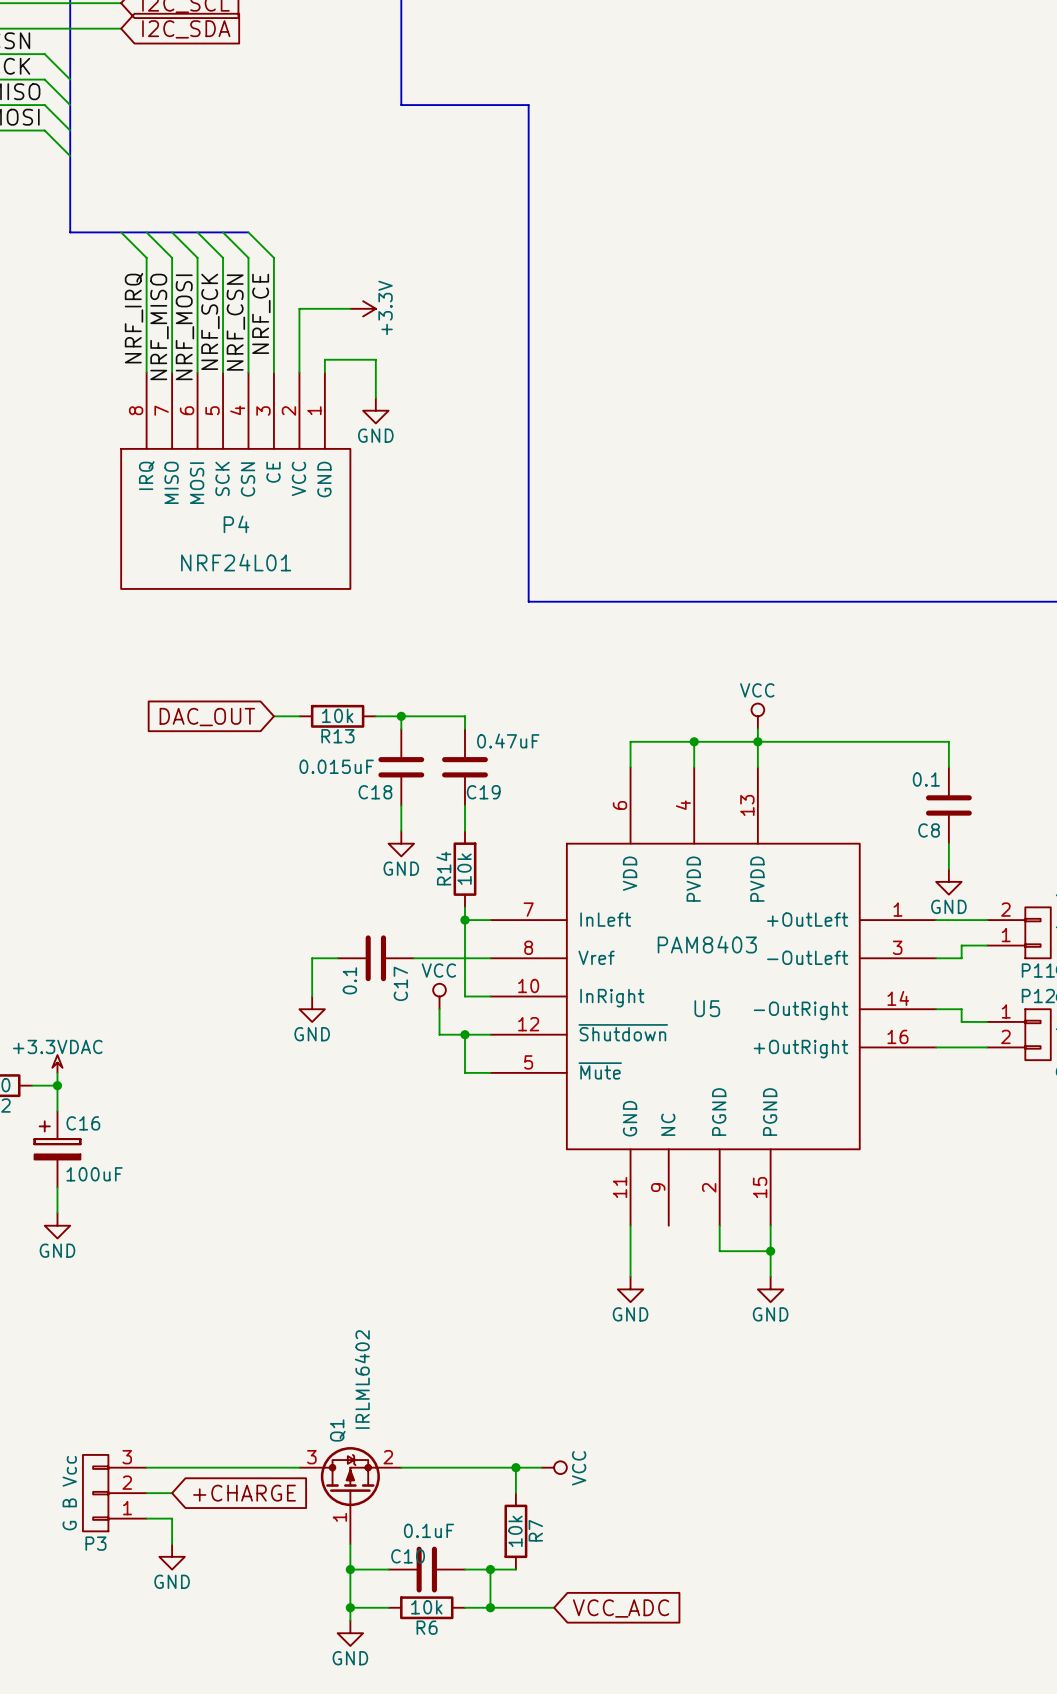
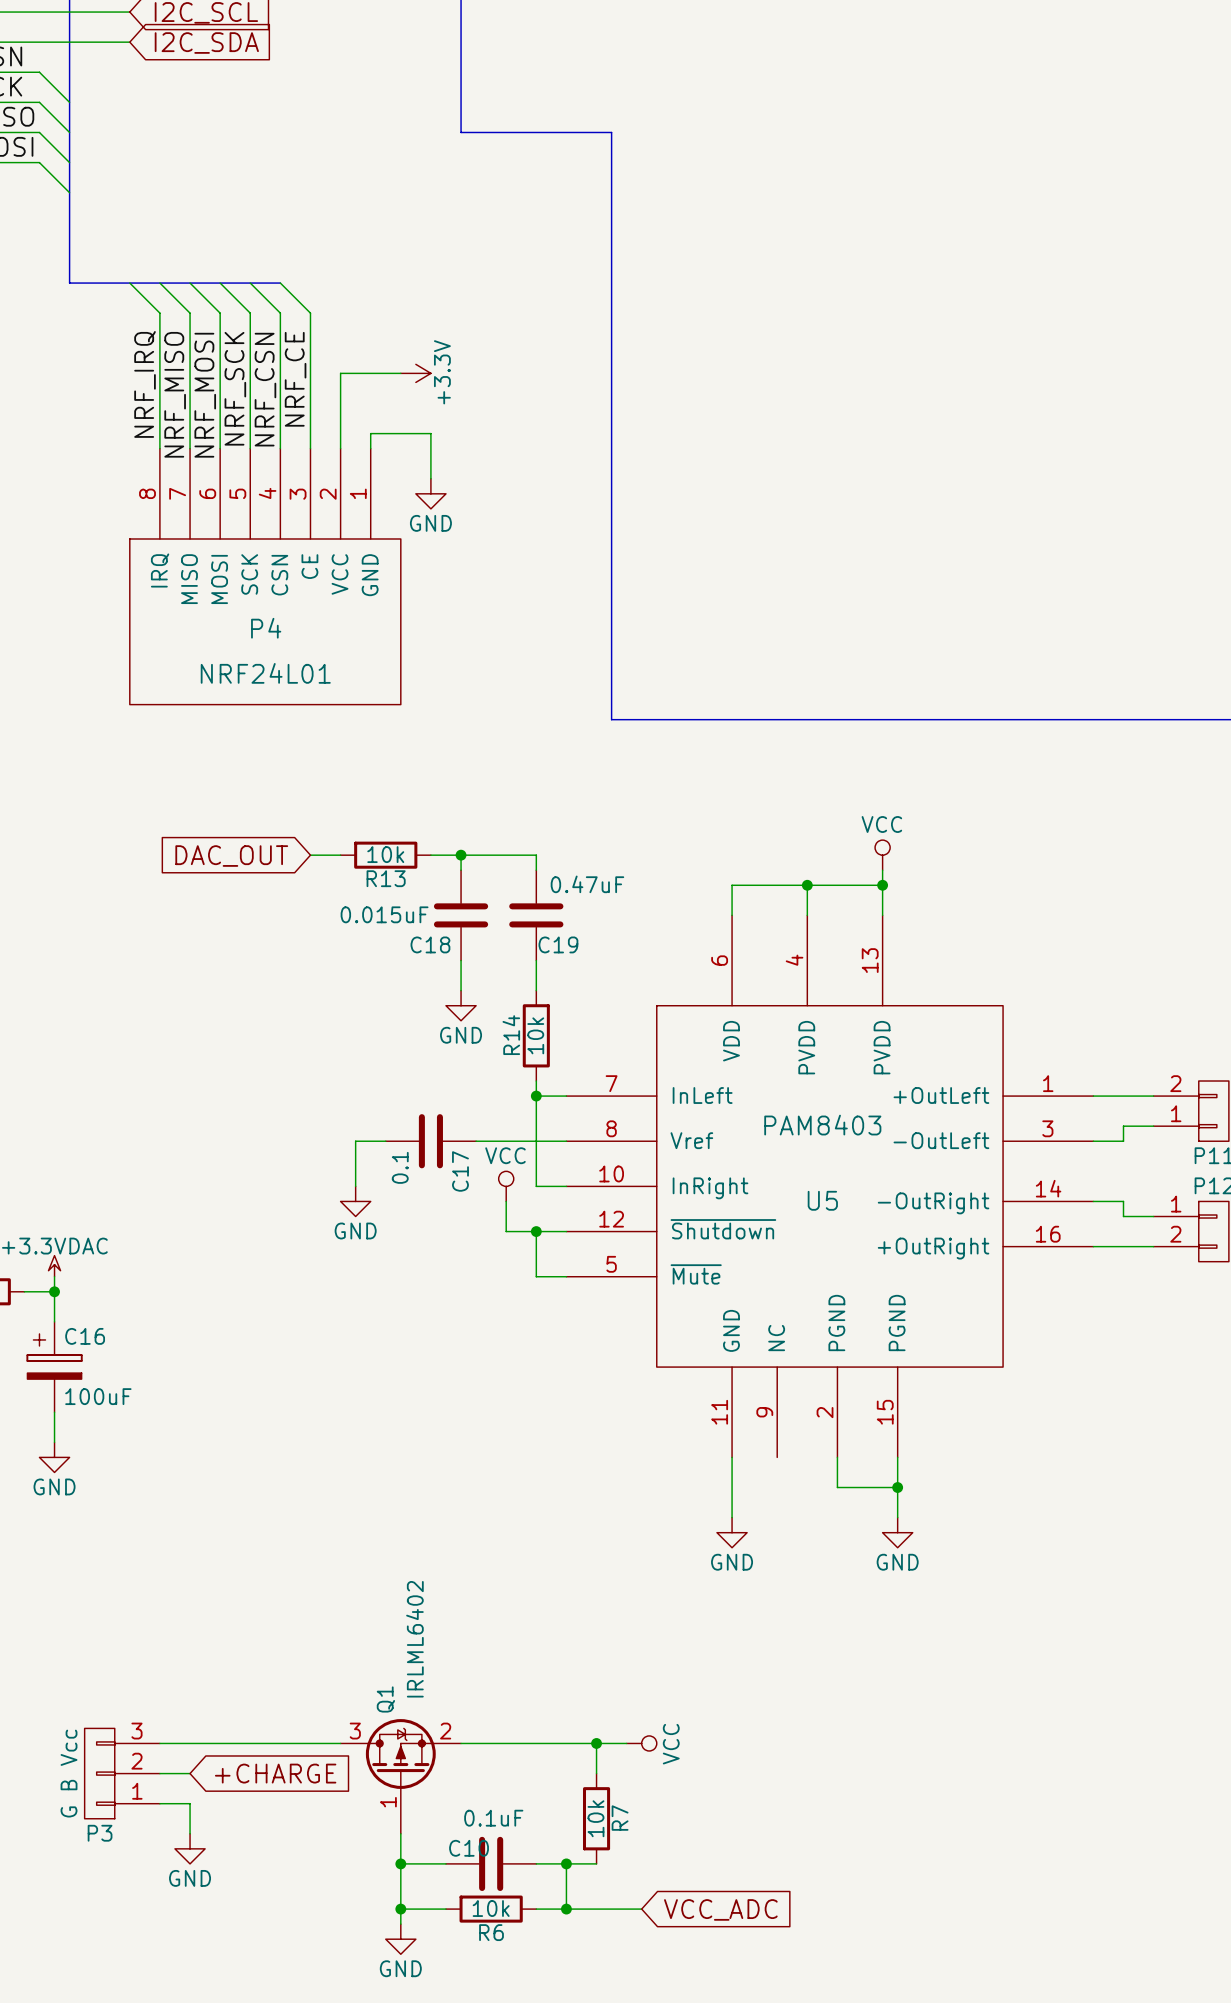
wire: (757, 741) (948, 741) (948, 767) -> none
C8: 0.1 (948, 805) -> none
wire: (948, 843) (948, 869) -> none
power symbol: GND (948, 881) -> none

